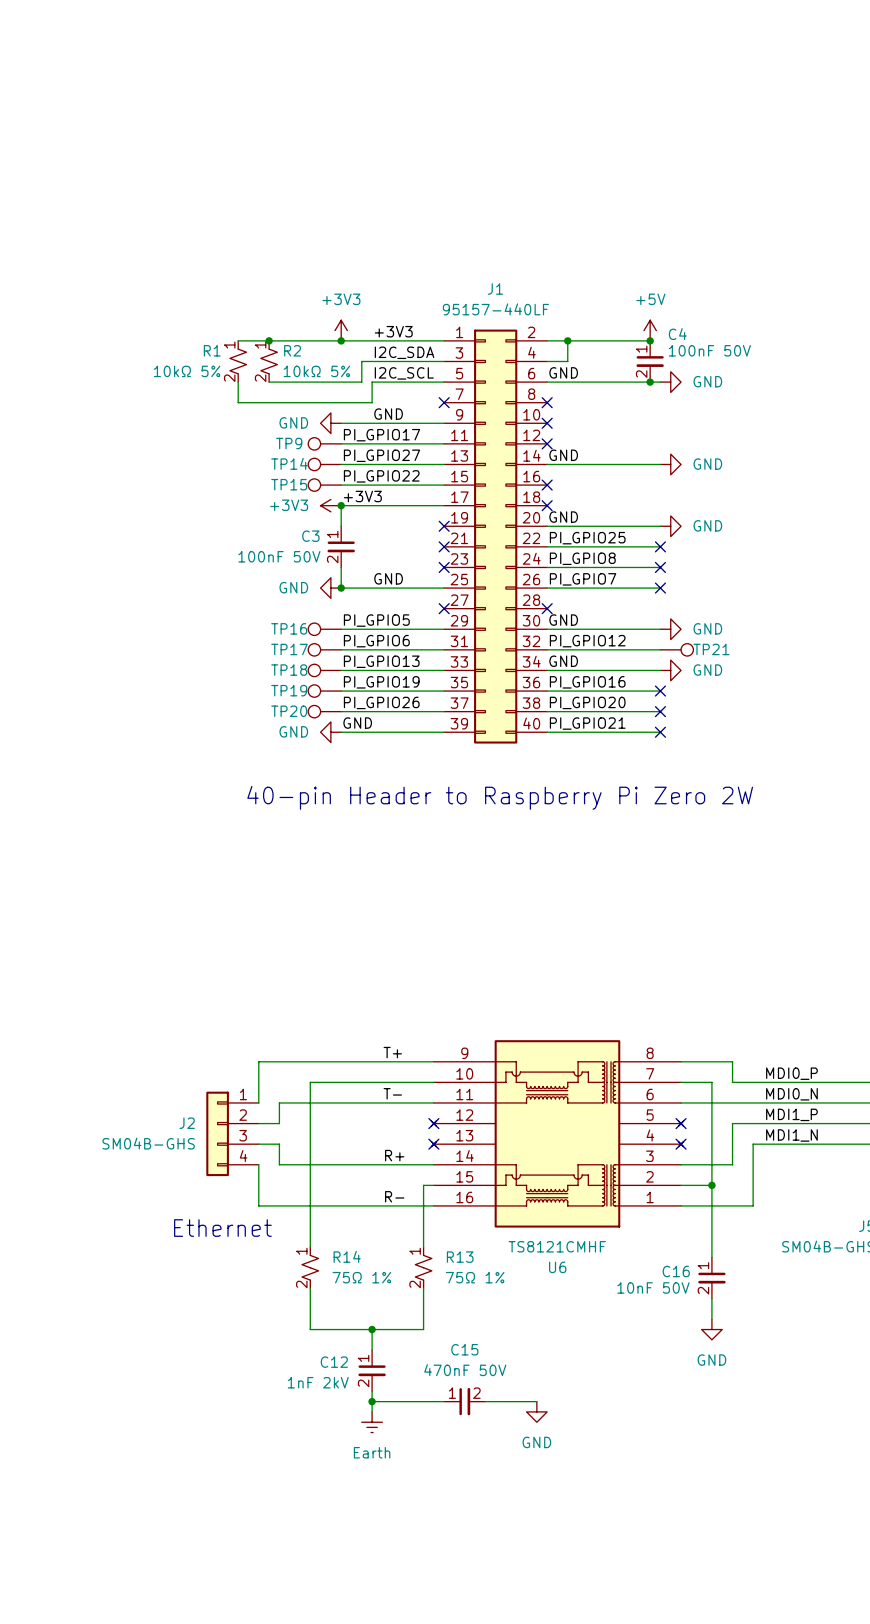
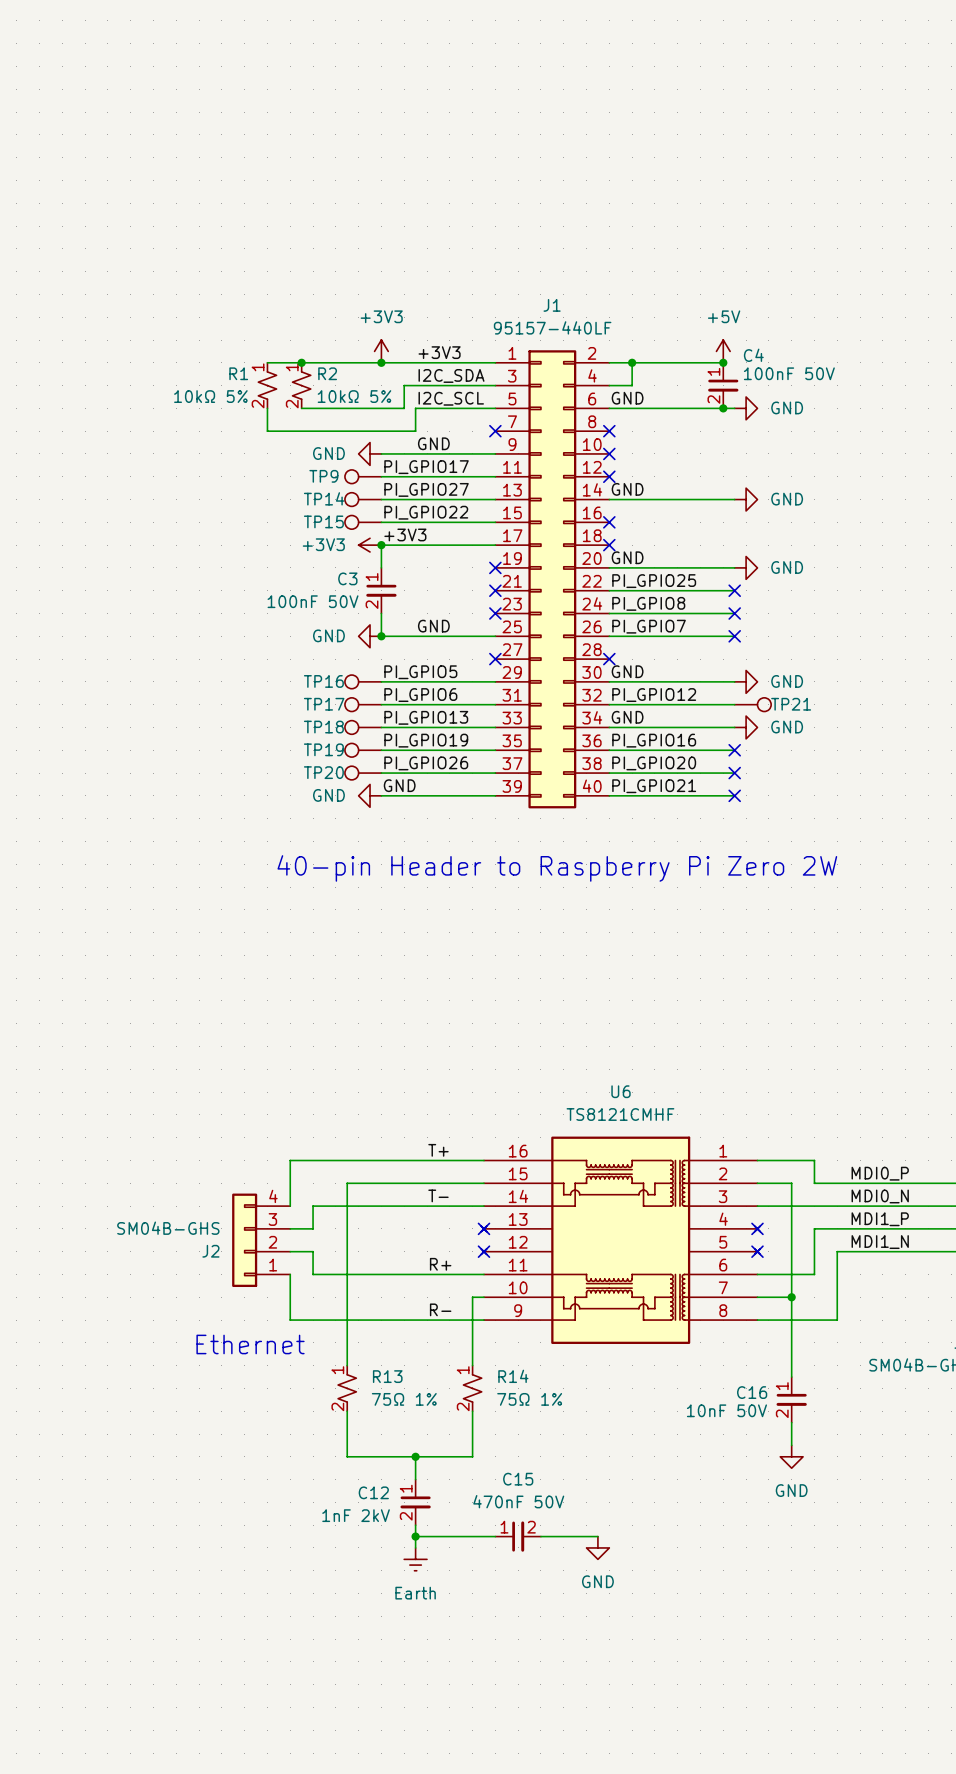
J2 flip: as is (217, 1133) -> up-down (244, 1240)
U6 flip: as is (557, 1133) -> up-down (620, 1240)
R14 name: R14 (347, 1256) -> R13 (387, 1376)
R13 name: R13 (460, 1257) -> R14 (513, 1376)

